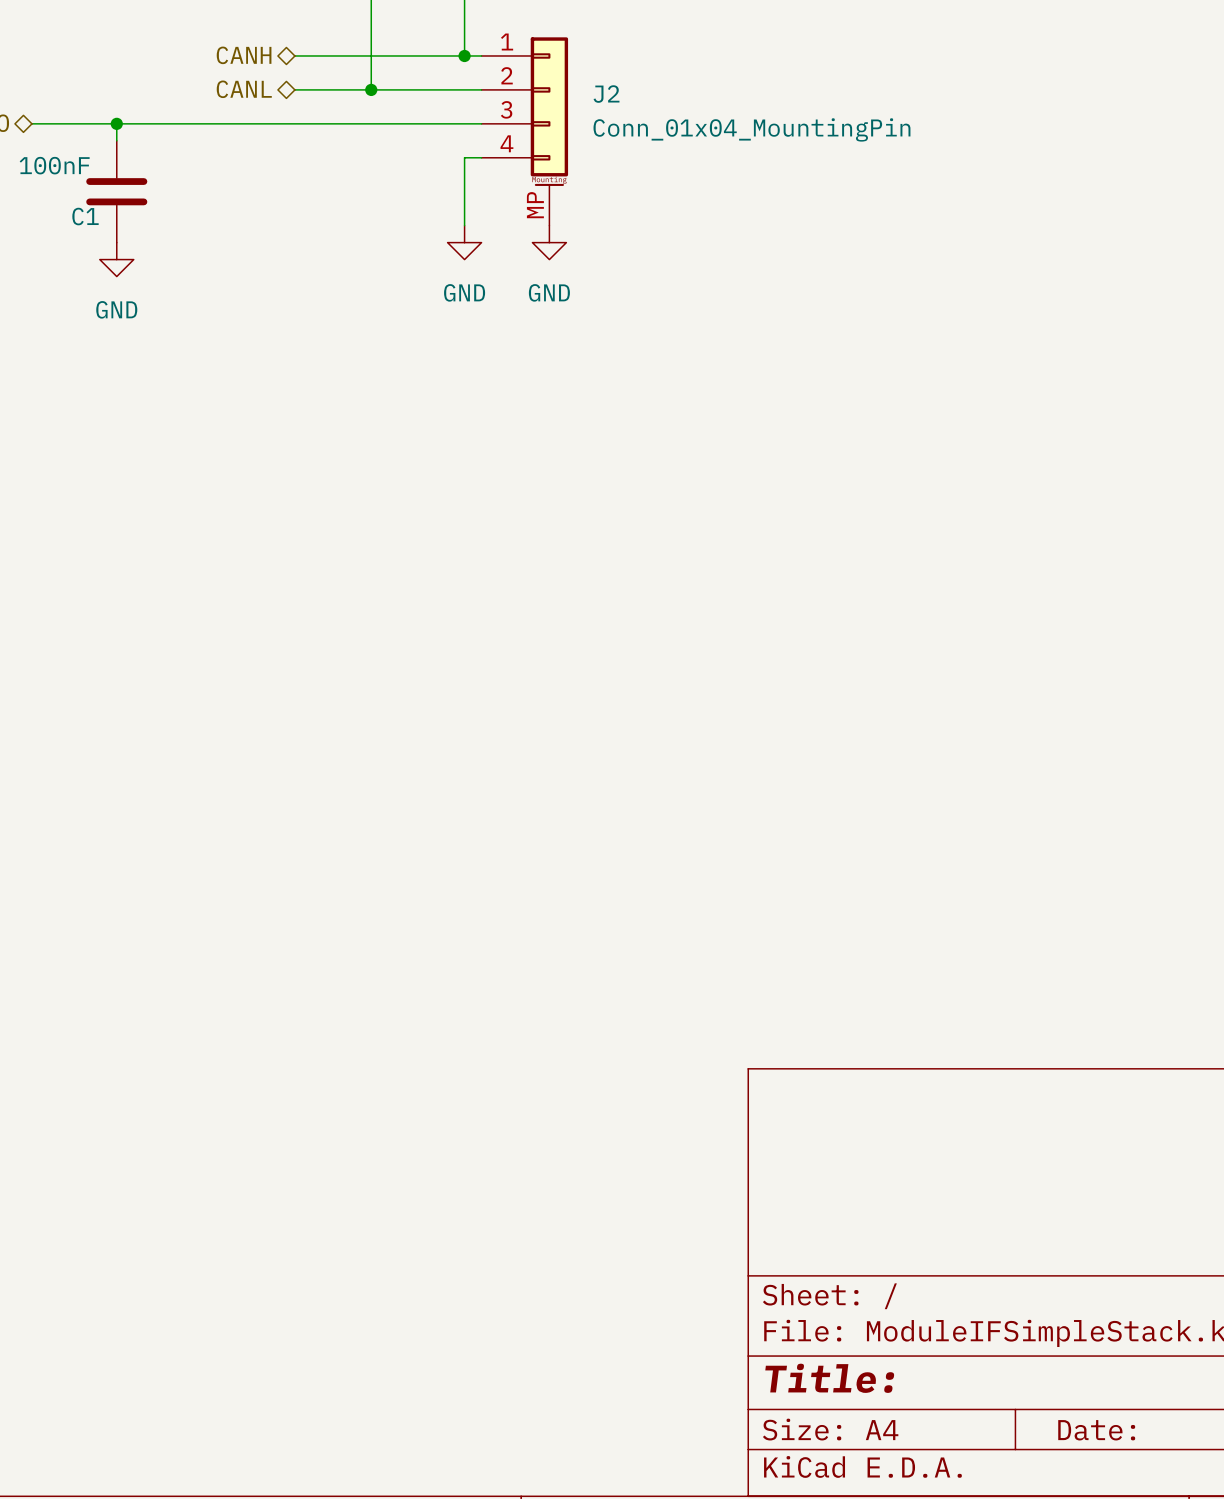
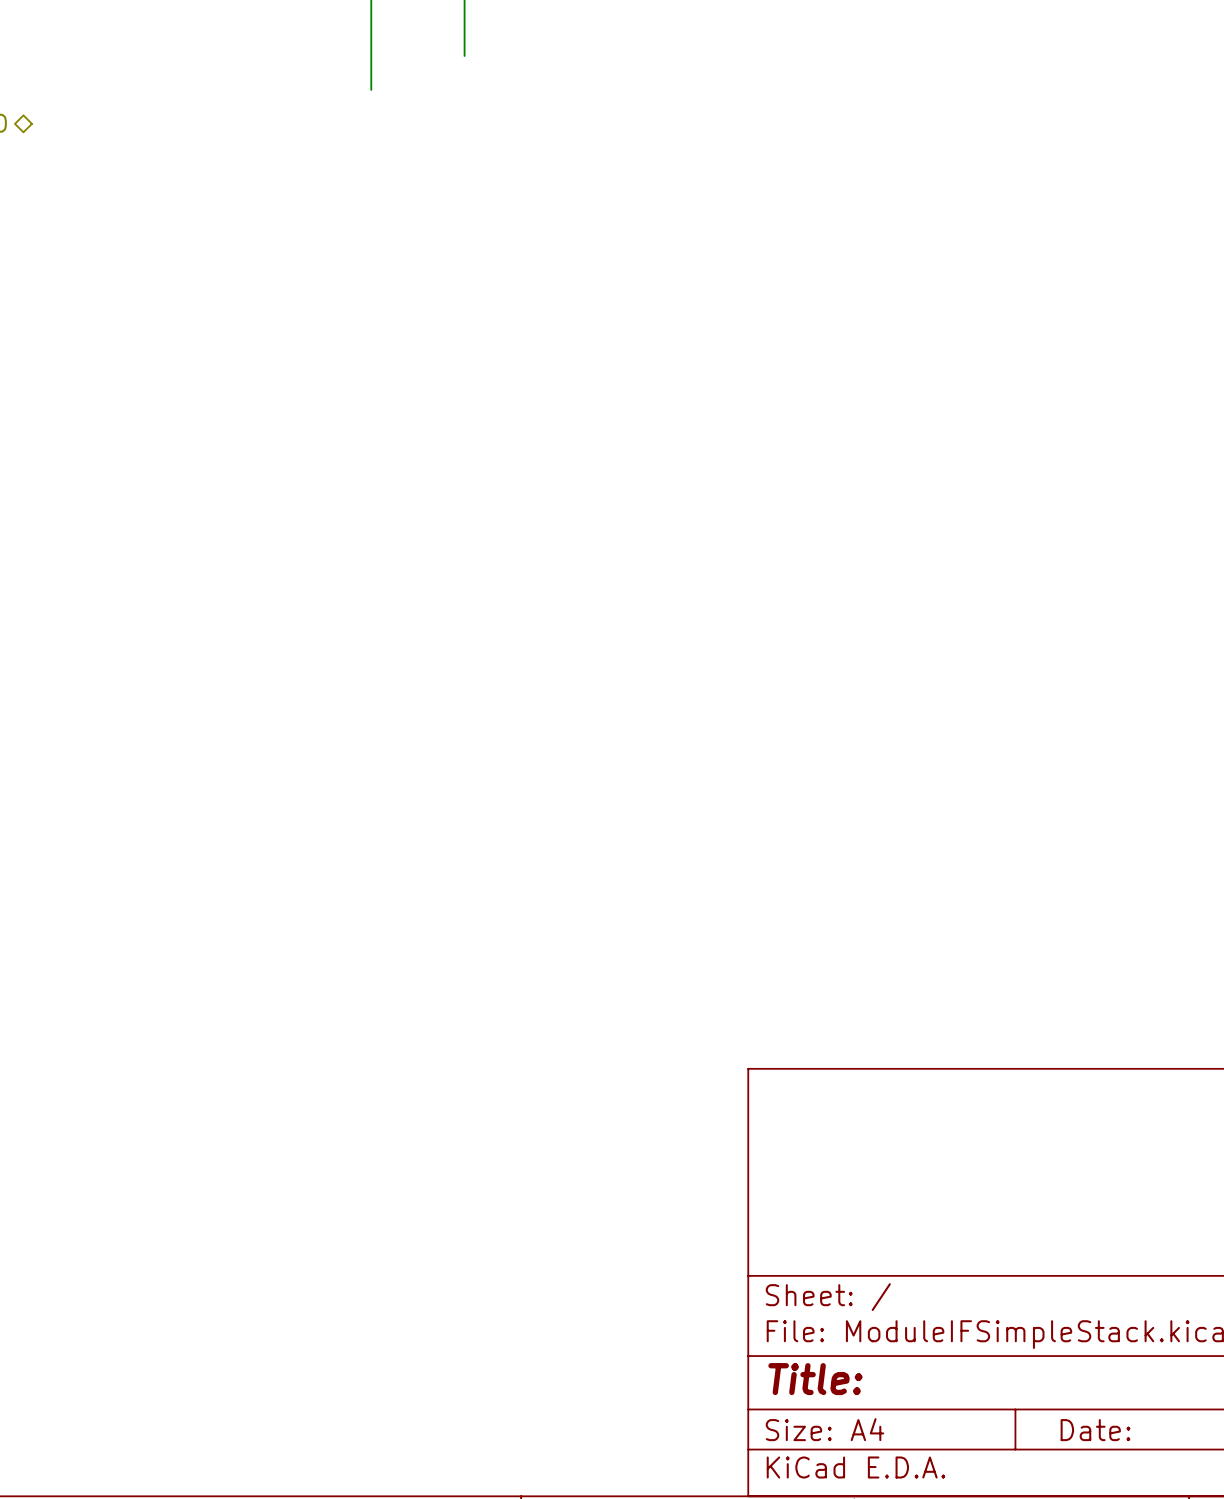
hierarchical label: CANH (244, 55) -> none
wire: (294, 55) (481, 55) -> none
junction: (464, 55) -> none
hierarchical label: CANL (244, 89) -> none
wire: (294, 89) (481, 89) -> none
junction: (371, 89) -> none
wire: (31, 123) (481, 123) -> none
wire: (116, 123) (116, 140) -> none
junction: (116, 123) -> none
J2: Conn_01x04_MountingPin (524, 131) -> none
wire: (481, 157) (464, 157) (464, 225) -> none
C1: 100nF (116, 191) -> none
power symbol: GND (464, 242) -> none
power symbol: GND (549, 242) -> none
power symbol: GND (116, 259) -> none

